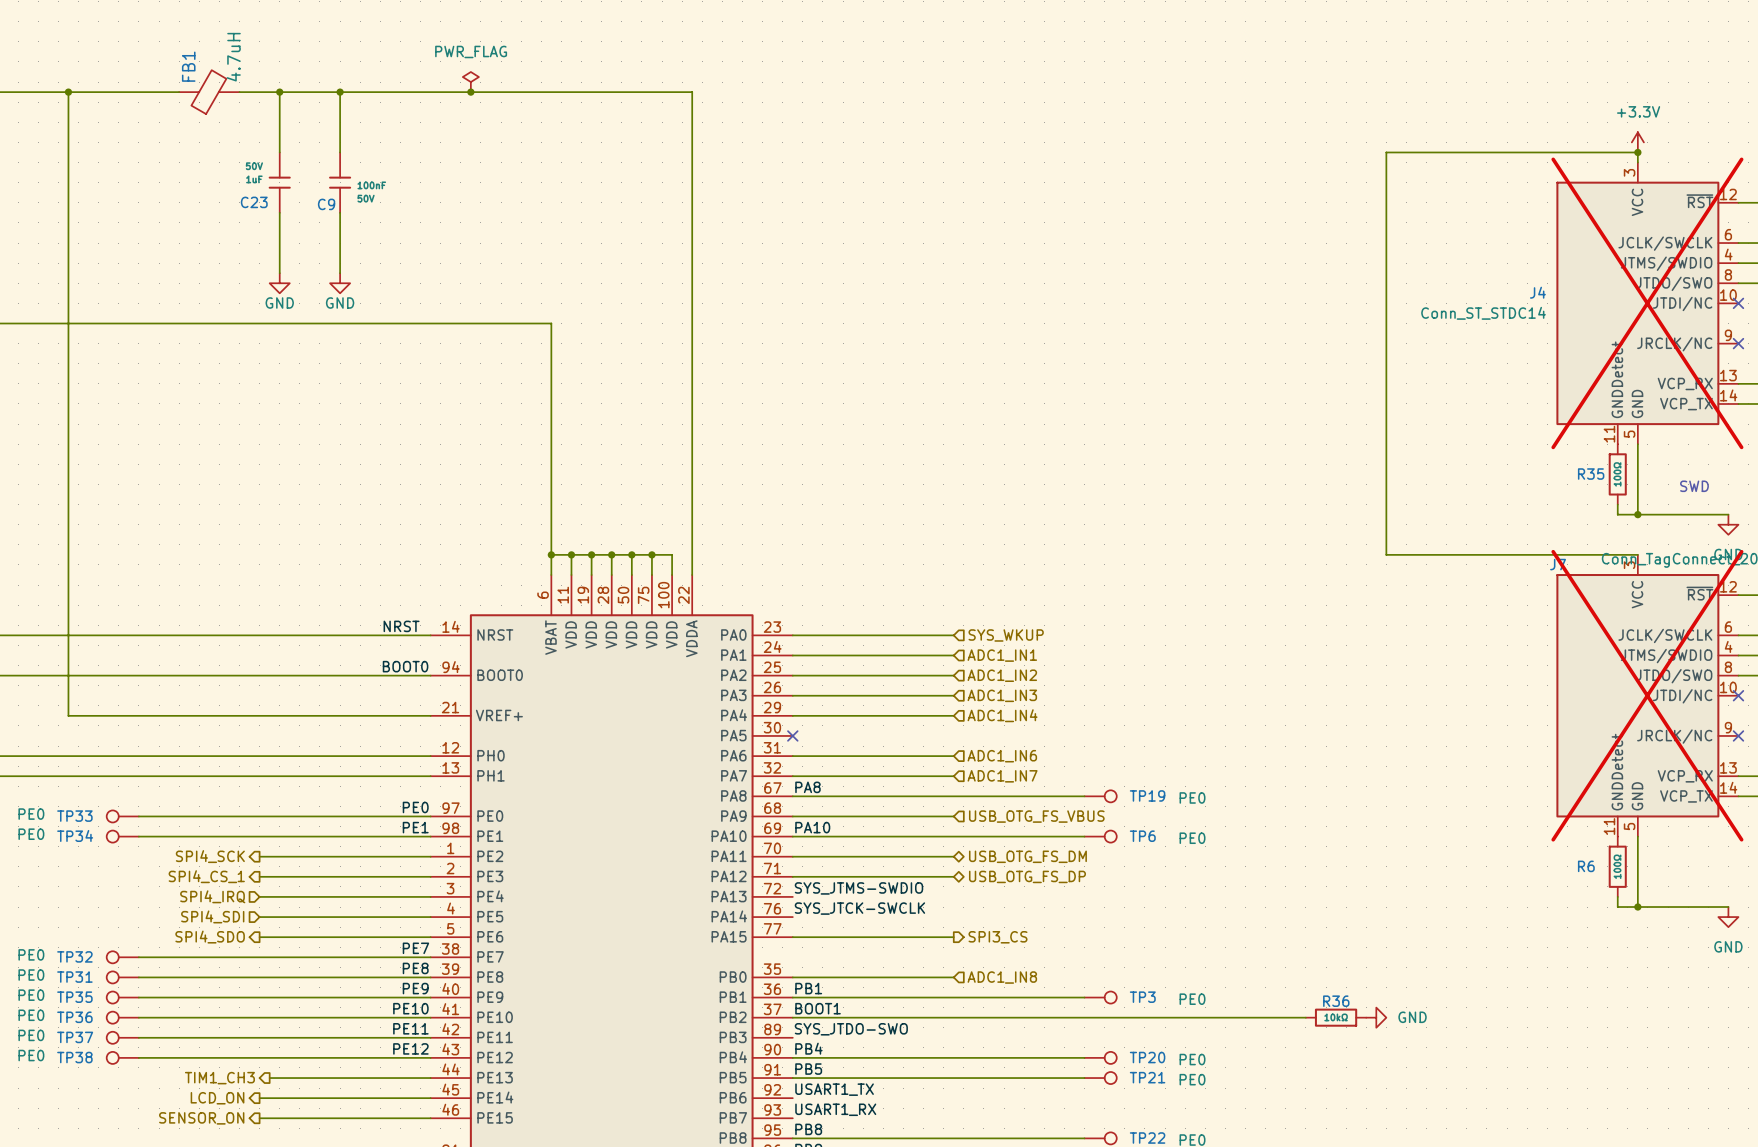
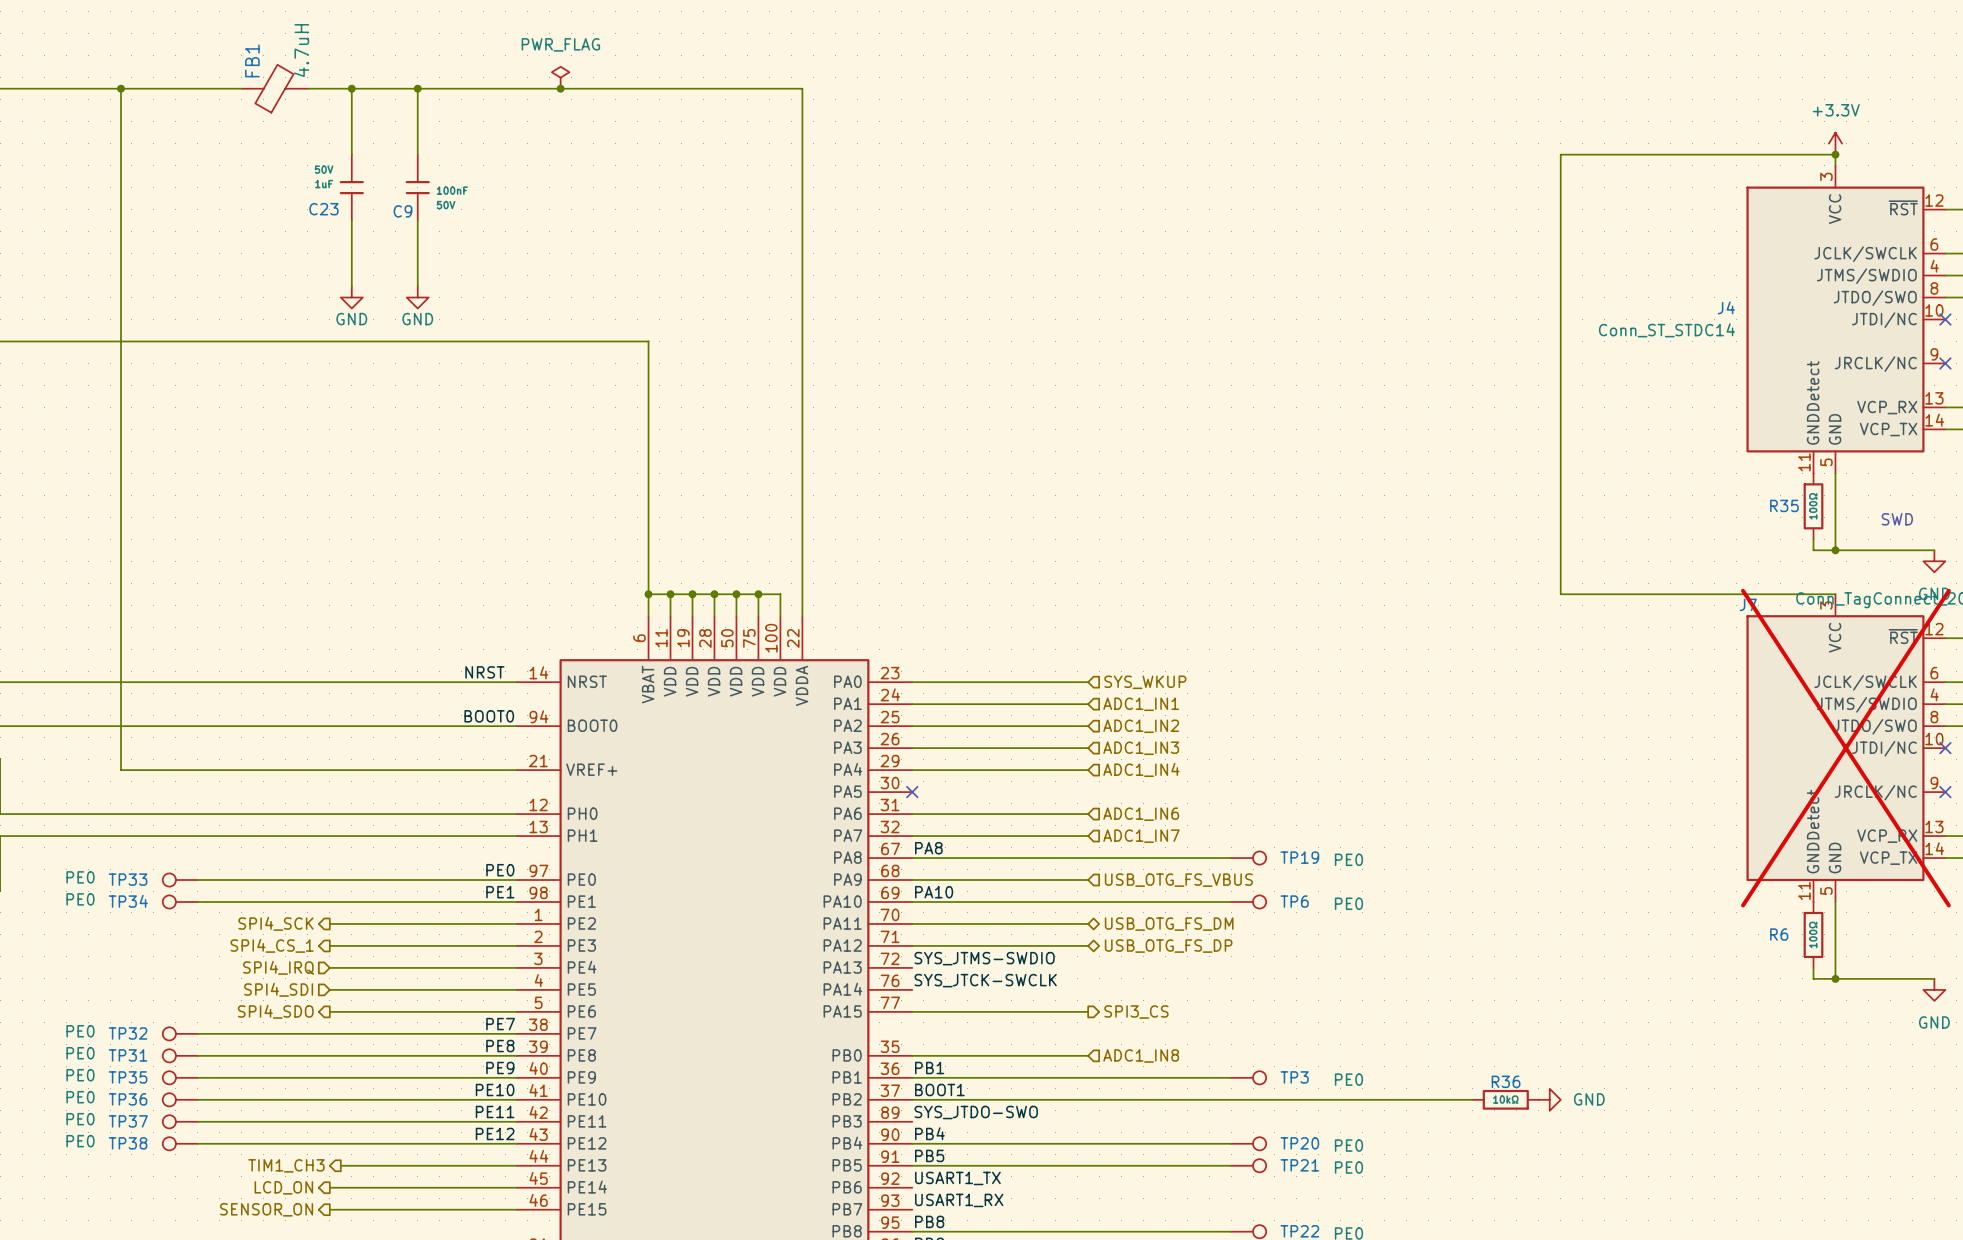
J4 do-not-place cross: (1647, 303) -> none

